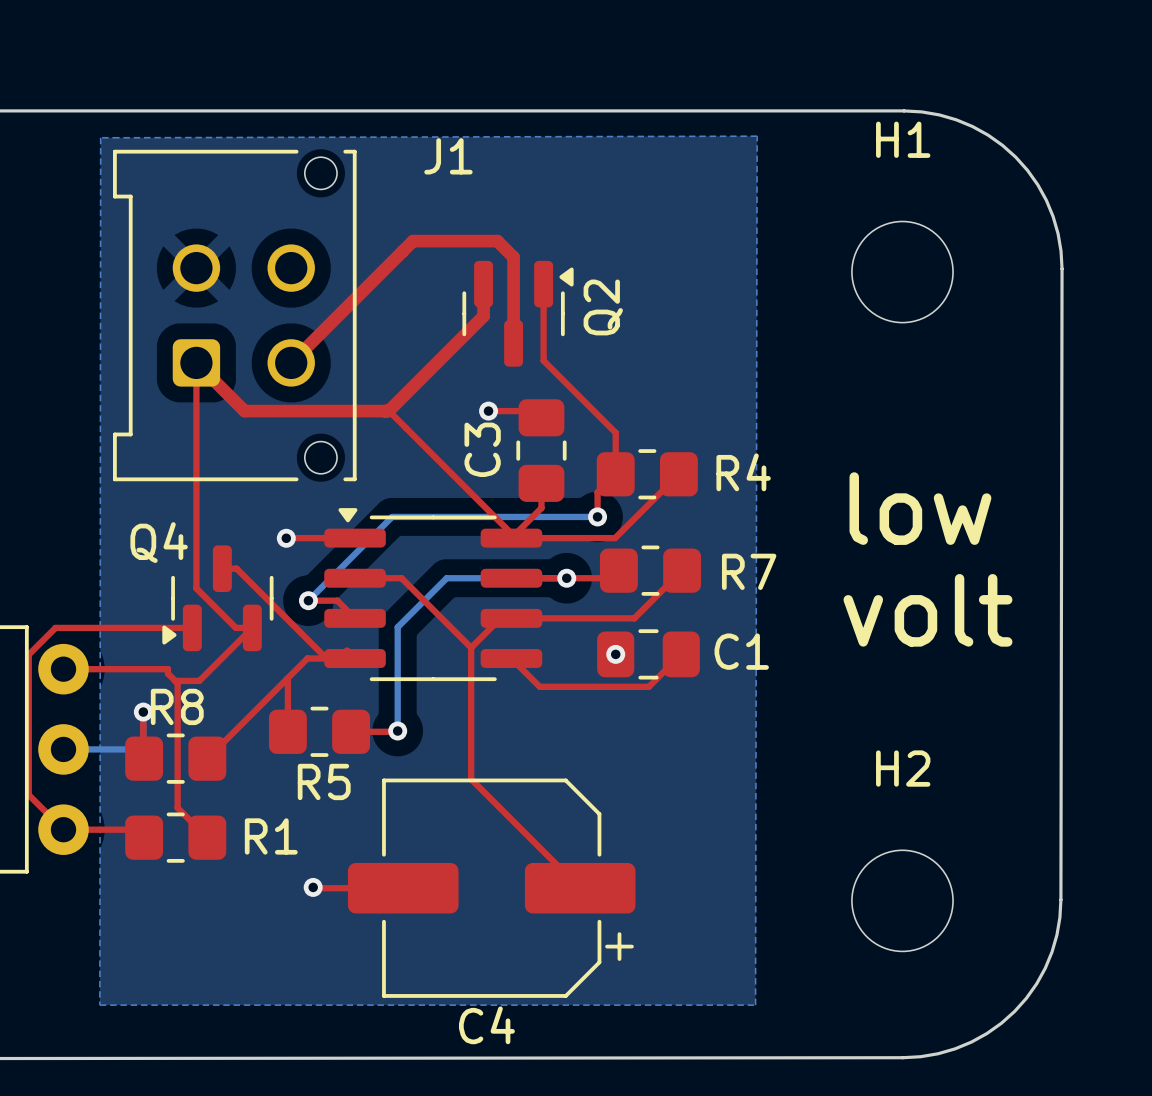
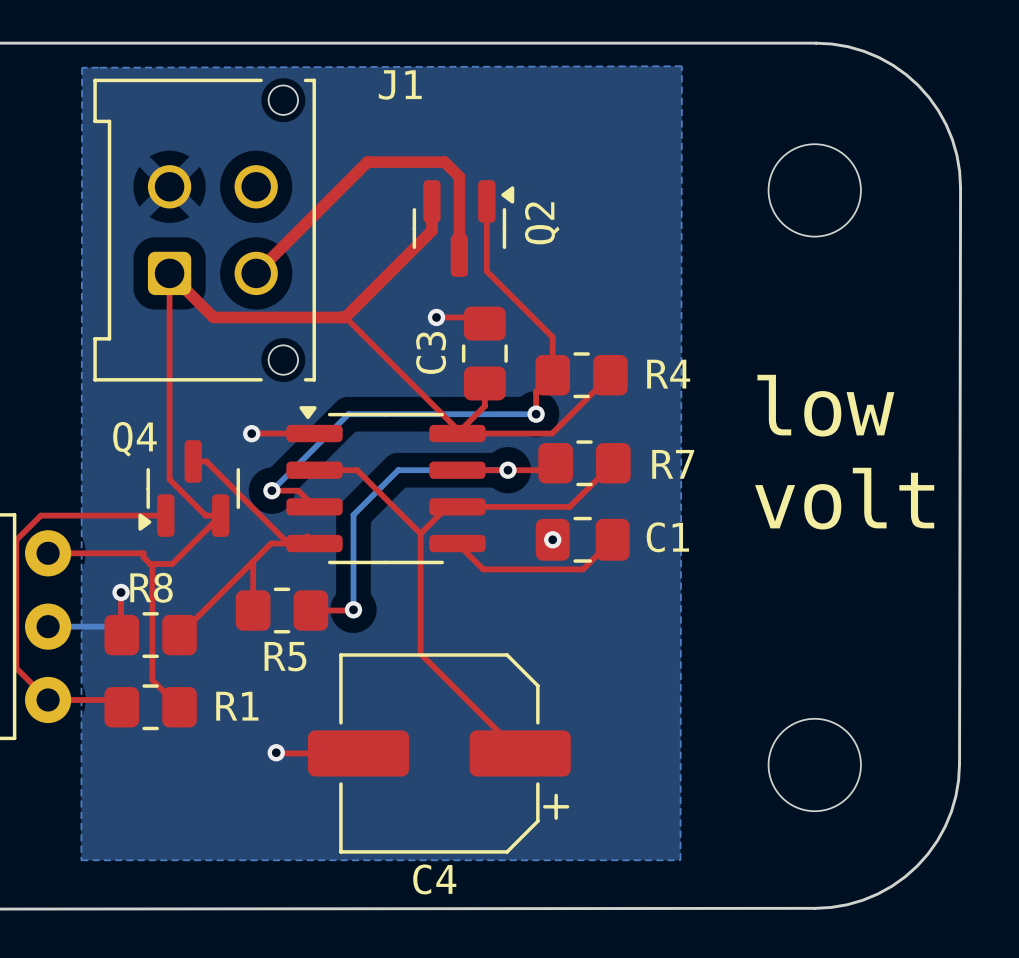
H1 name: H1 (903, 139) -> none
H2 name: H2 (903, 768) -> none

